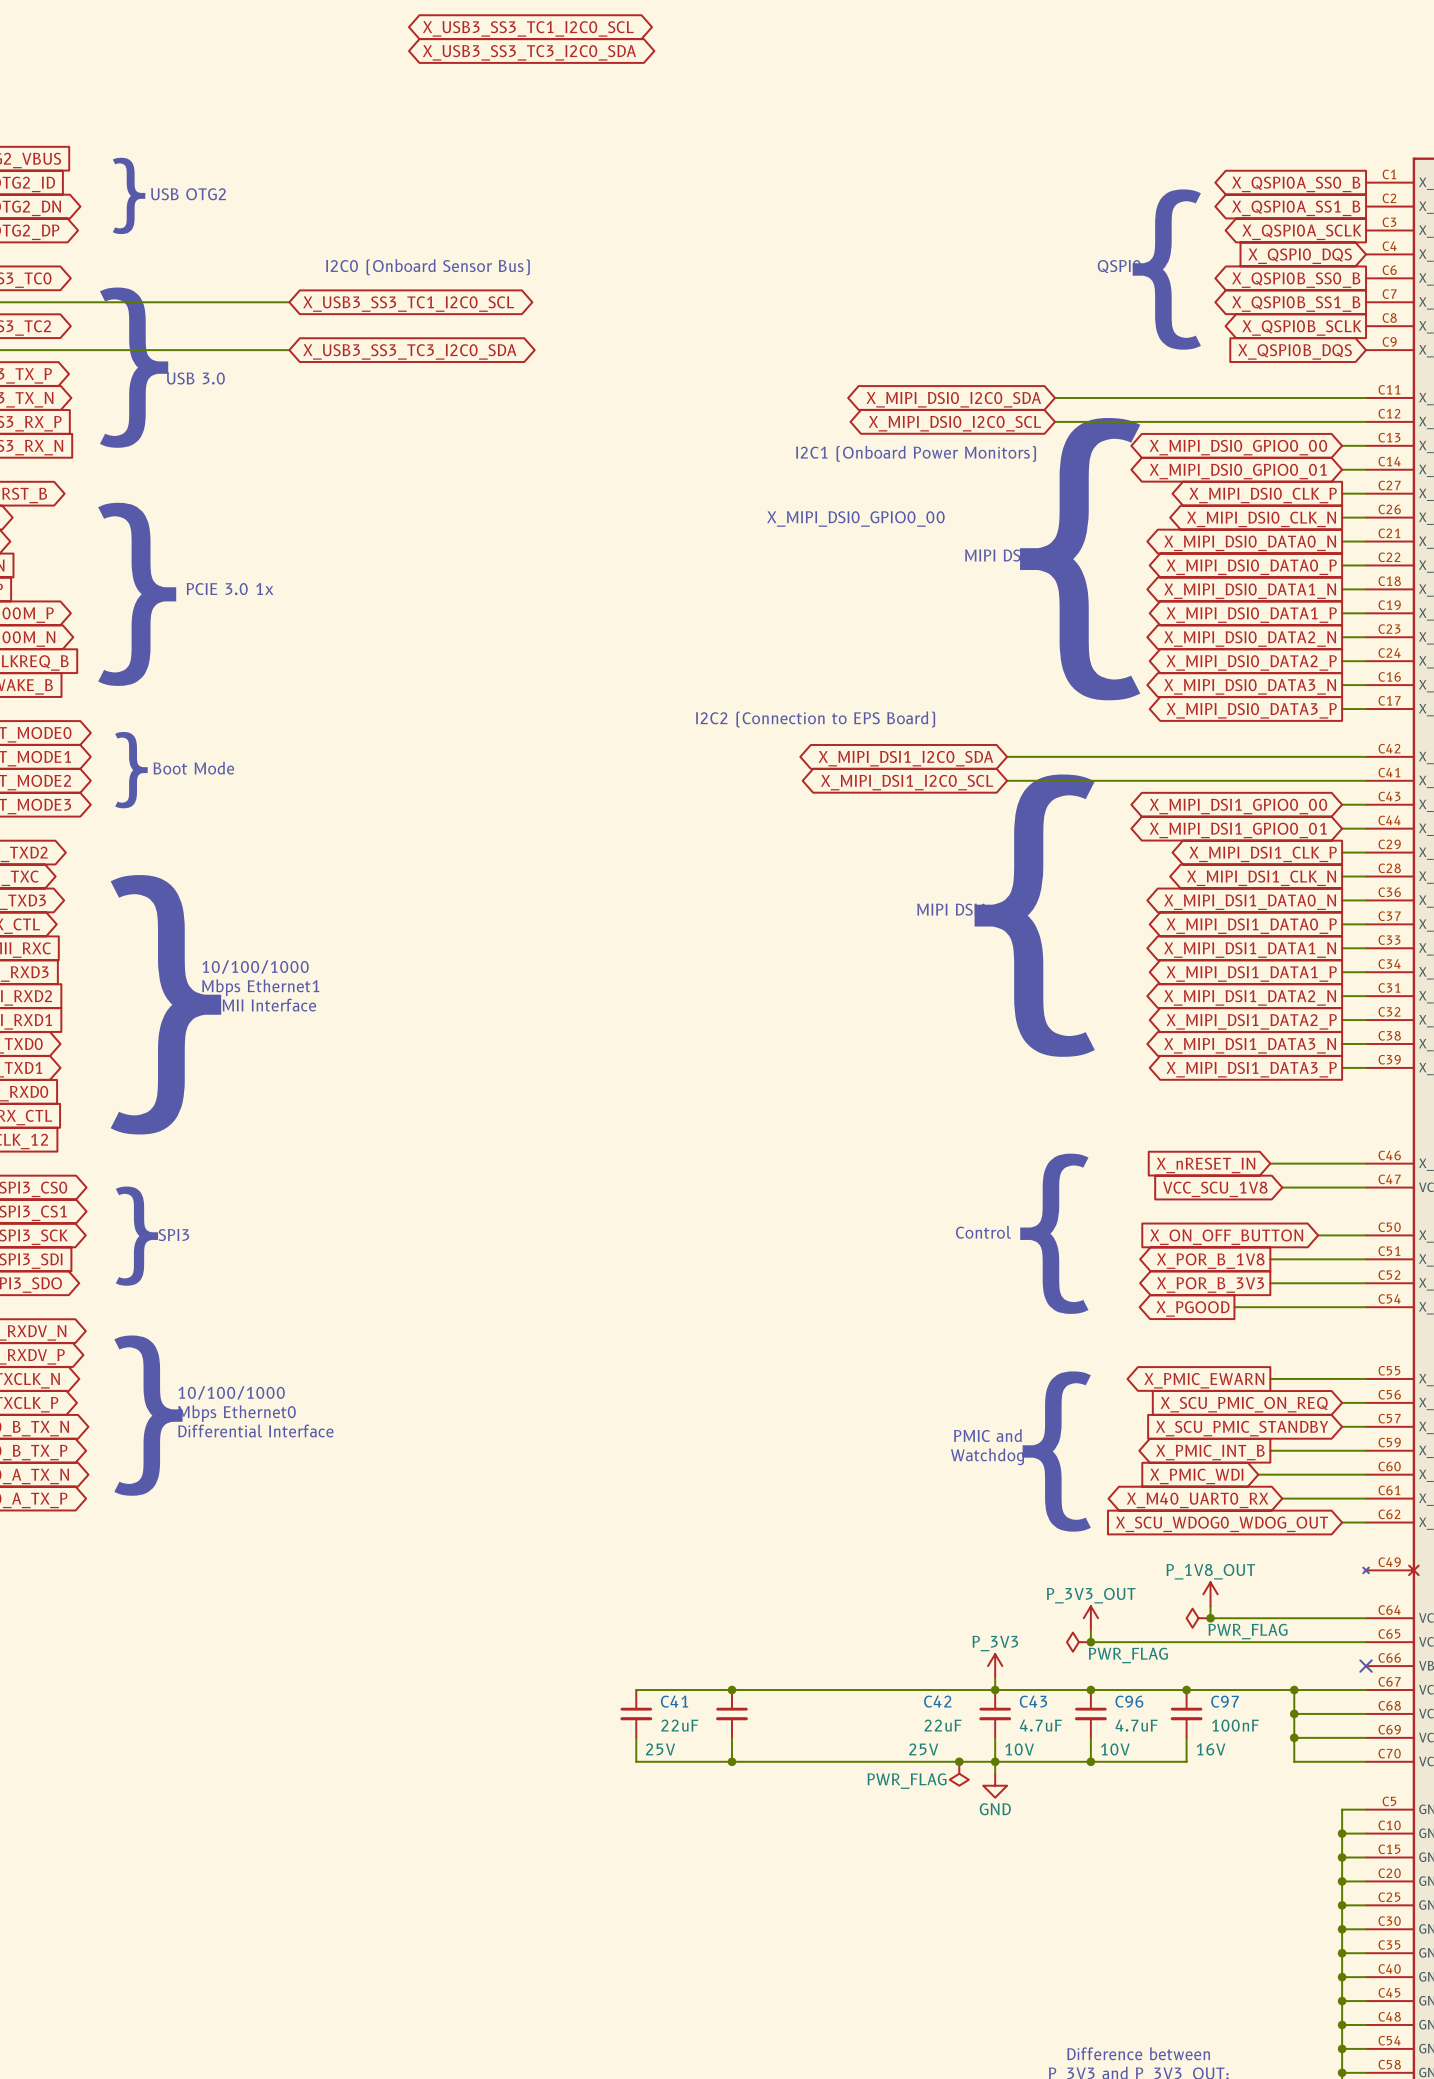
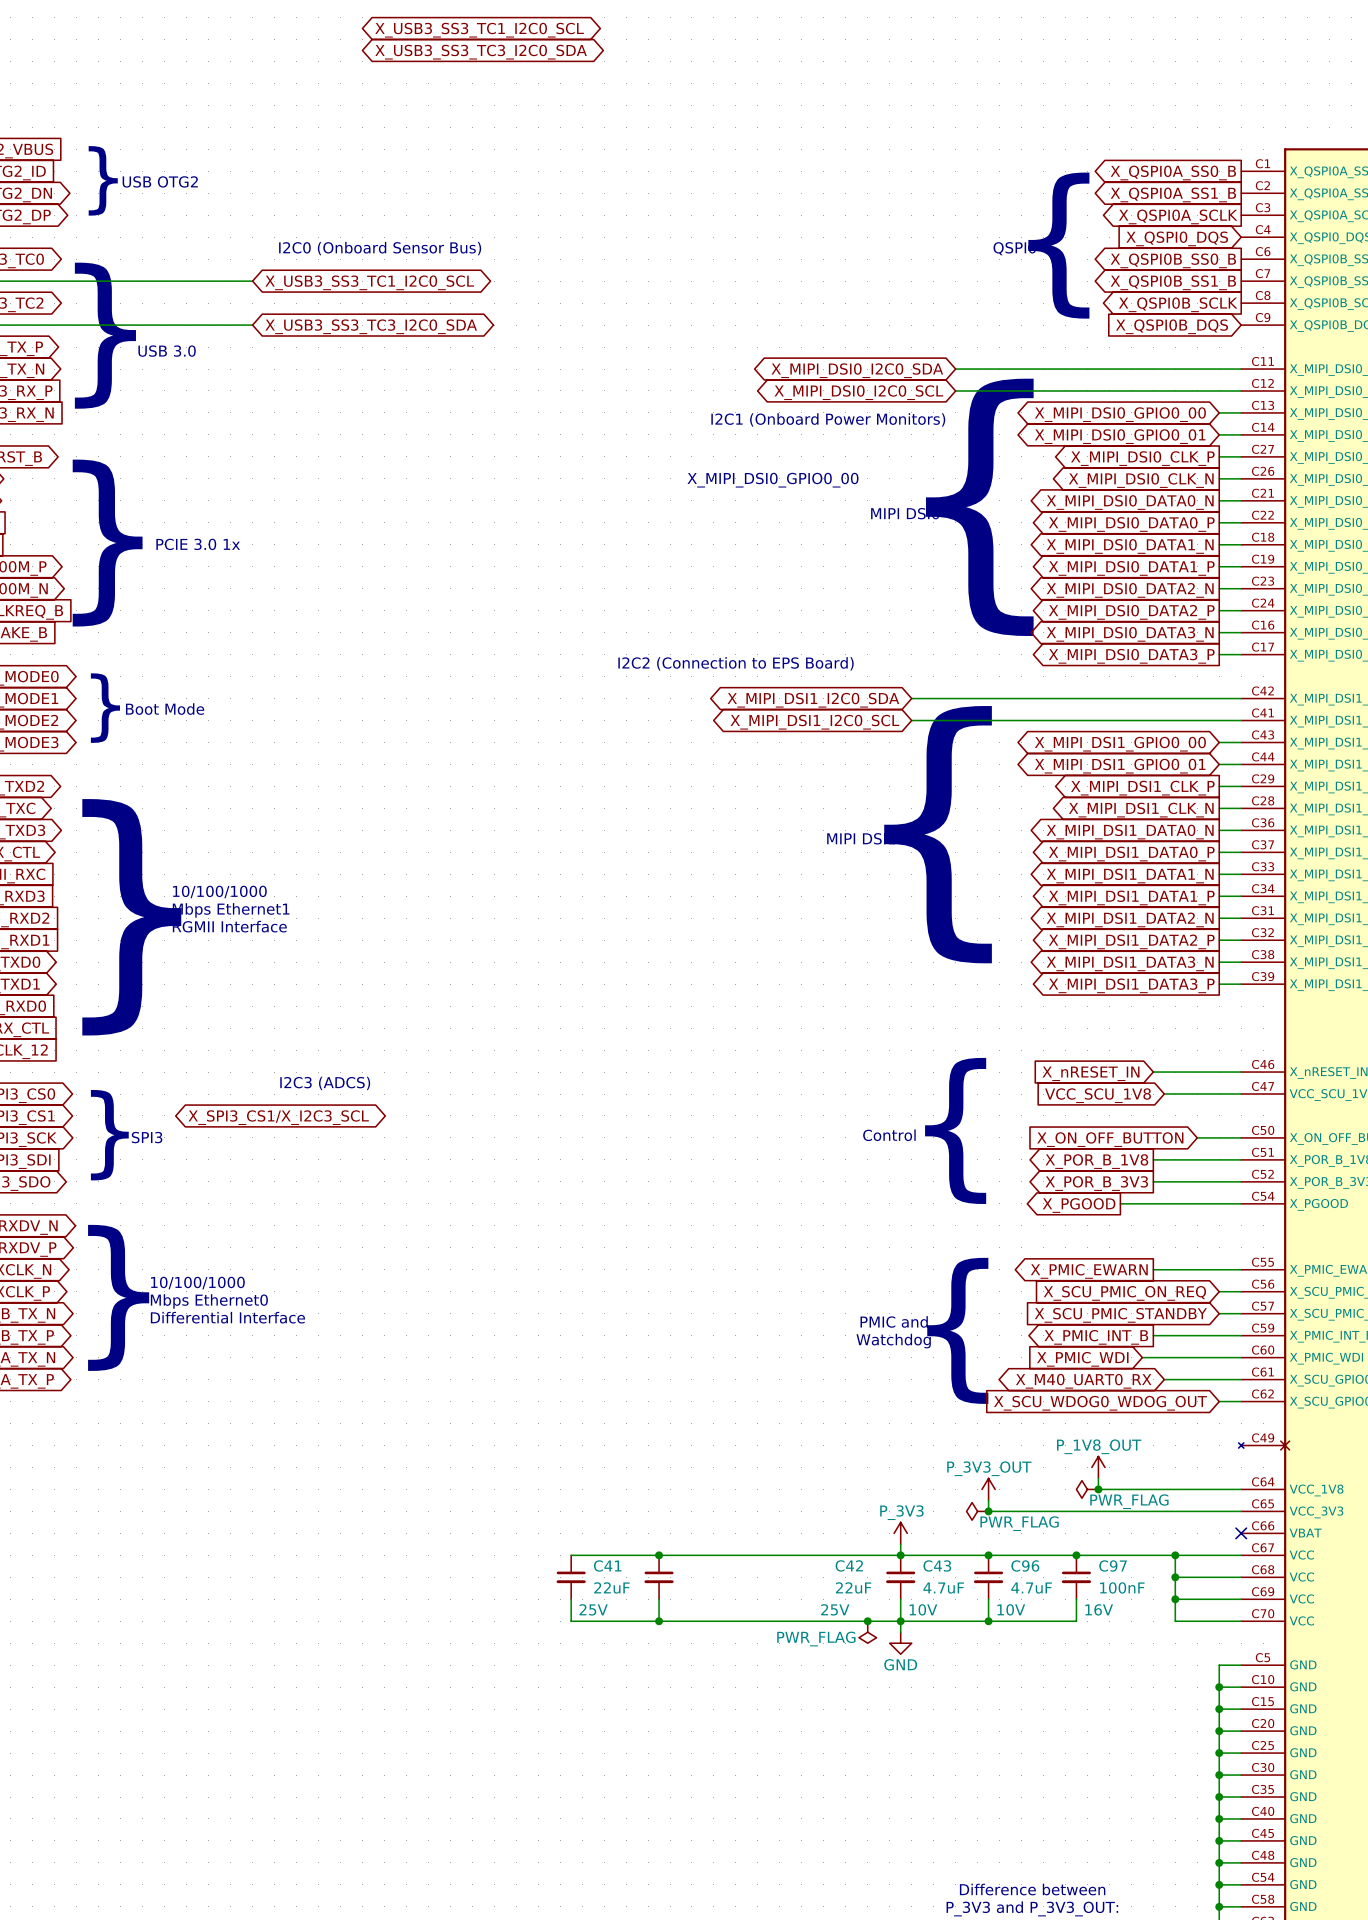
text: none -> I2C3 (ADCS) (325, 1083)
global label: none -> X_SPI3_CS1/X_I2C3_SCL (278, 1117)

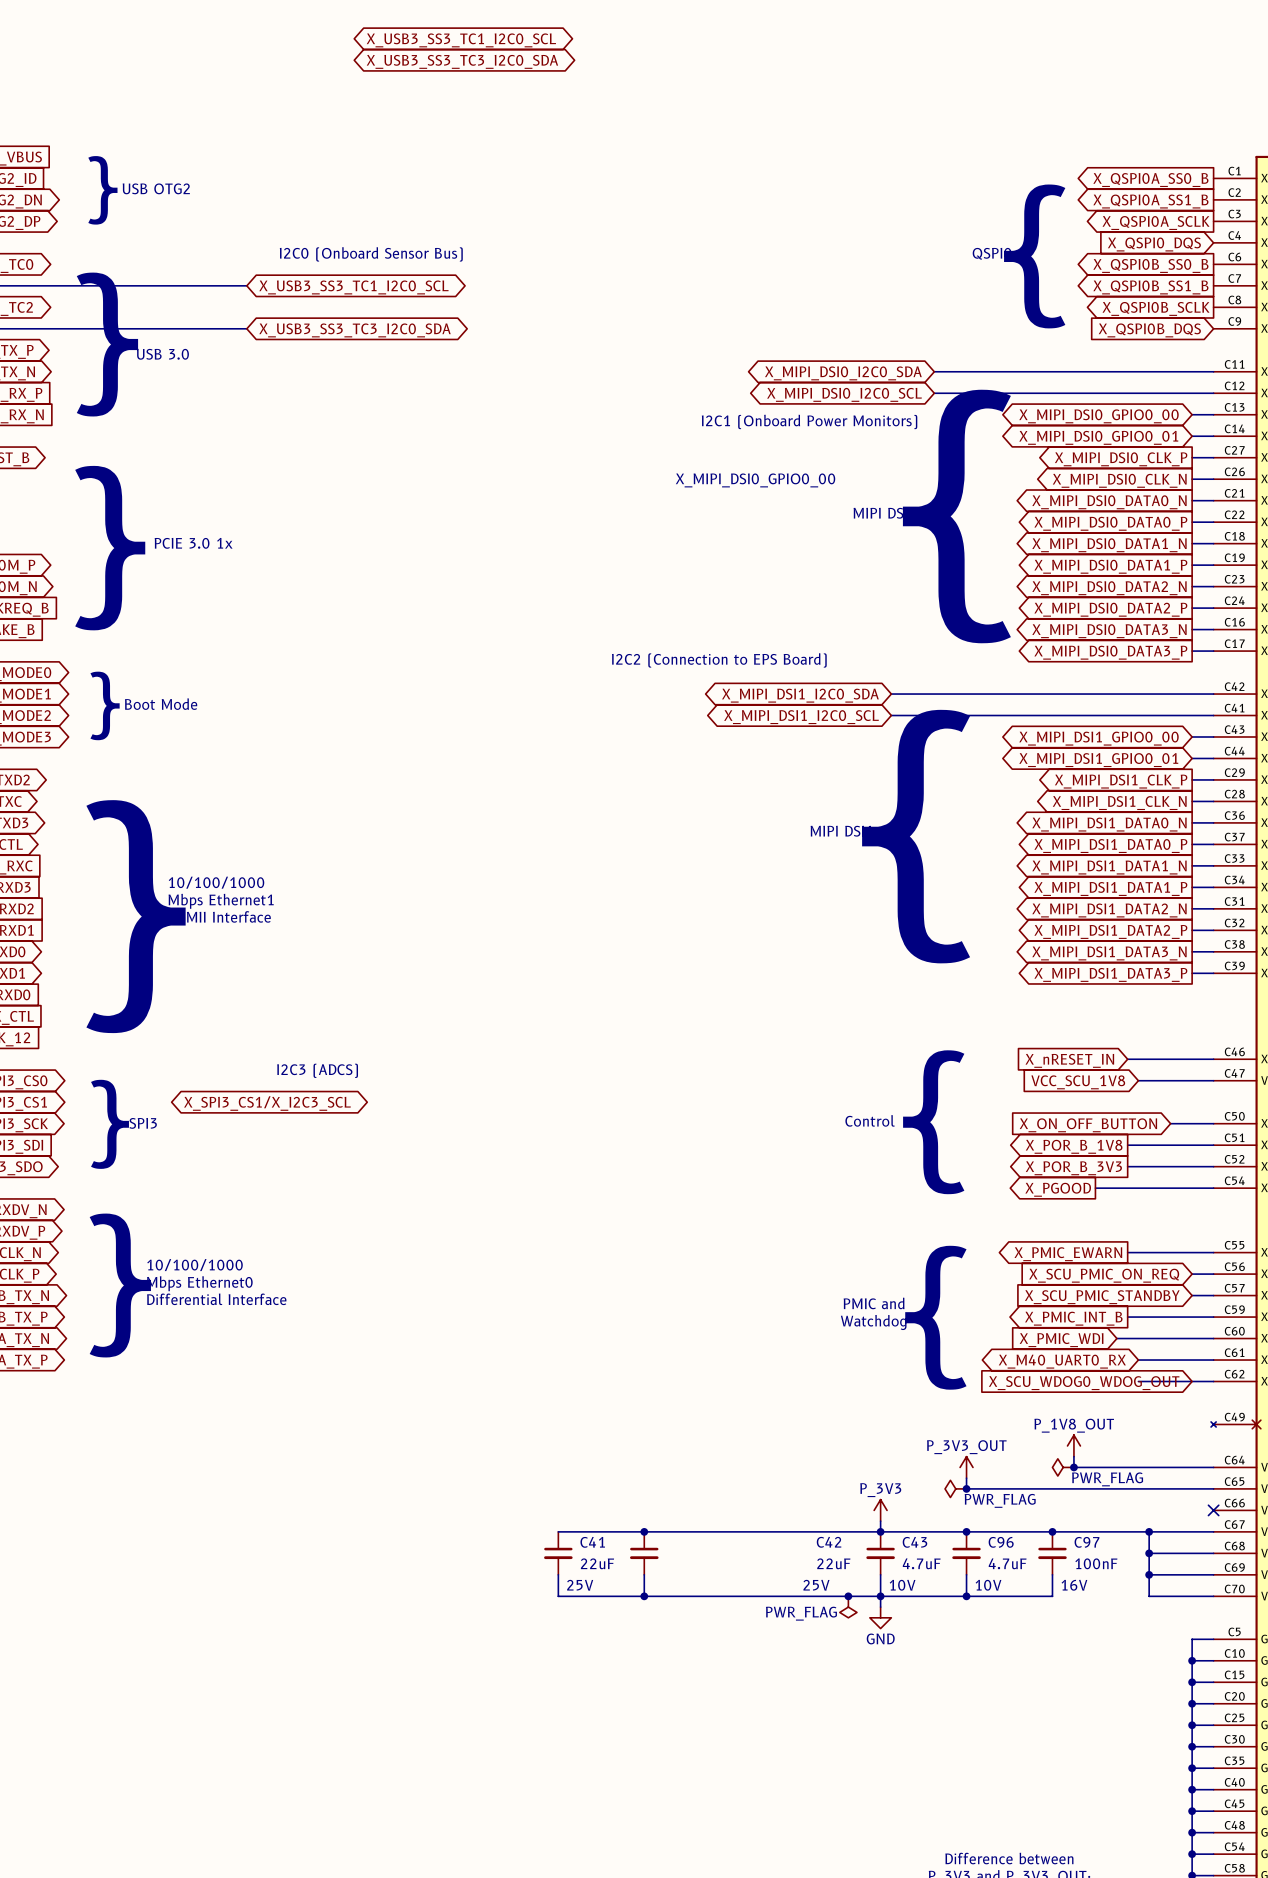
wire: none -> (1138, 1381) (1192, 1381)

